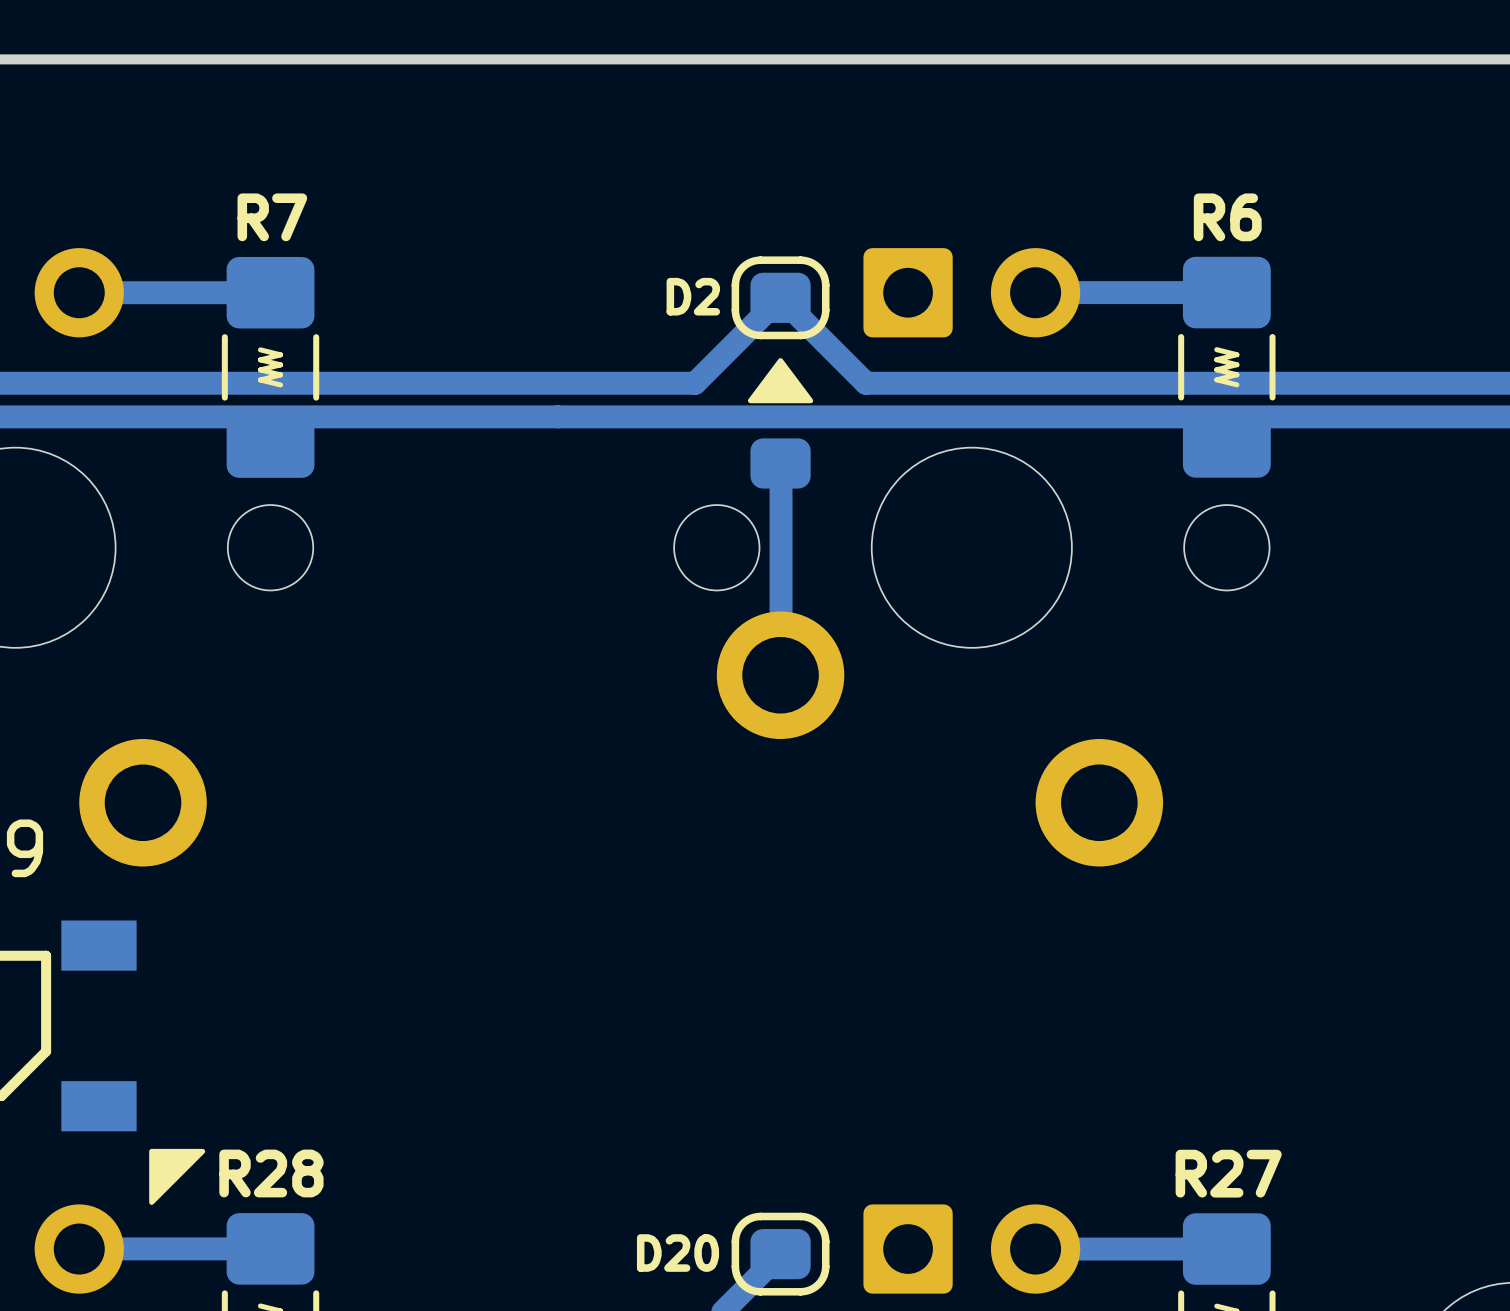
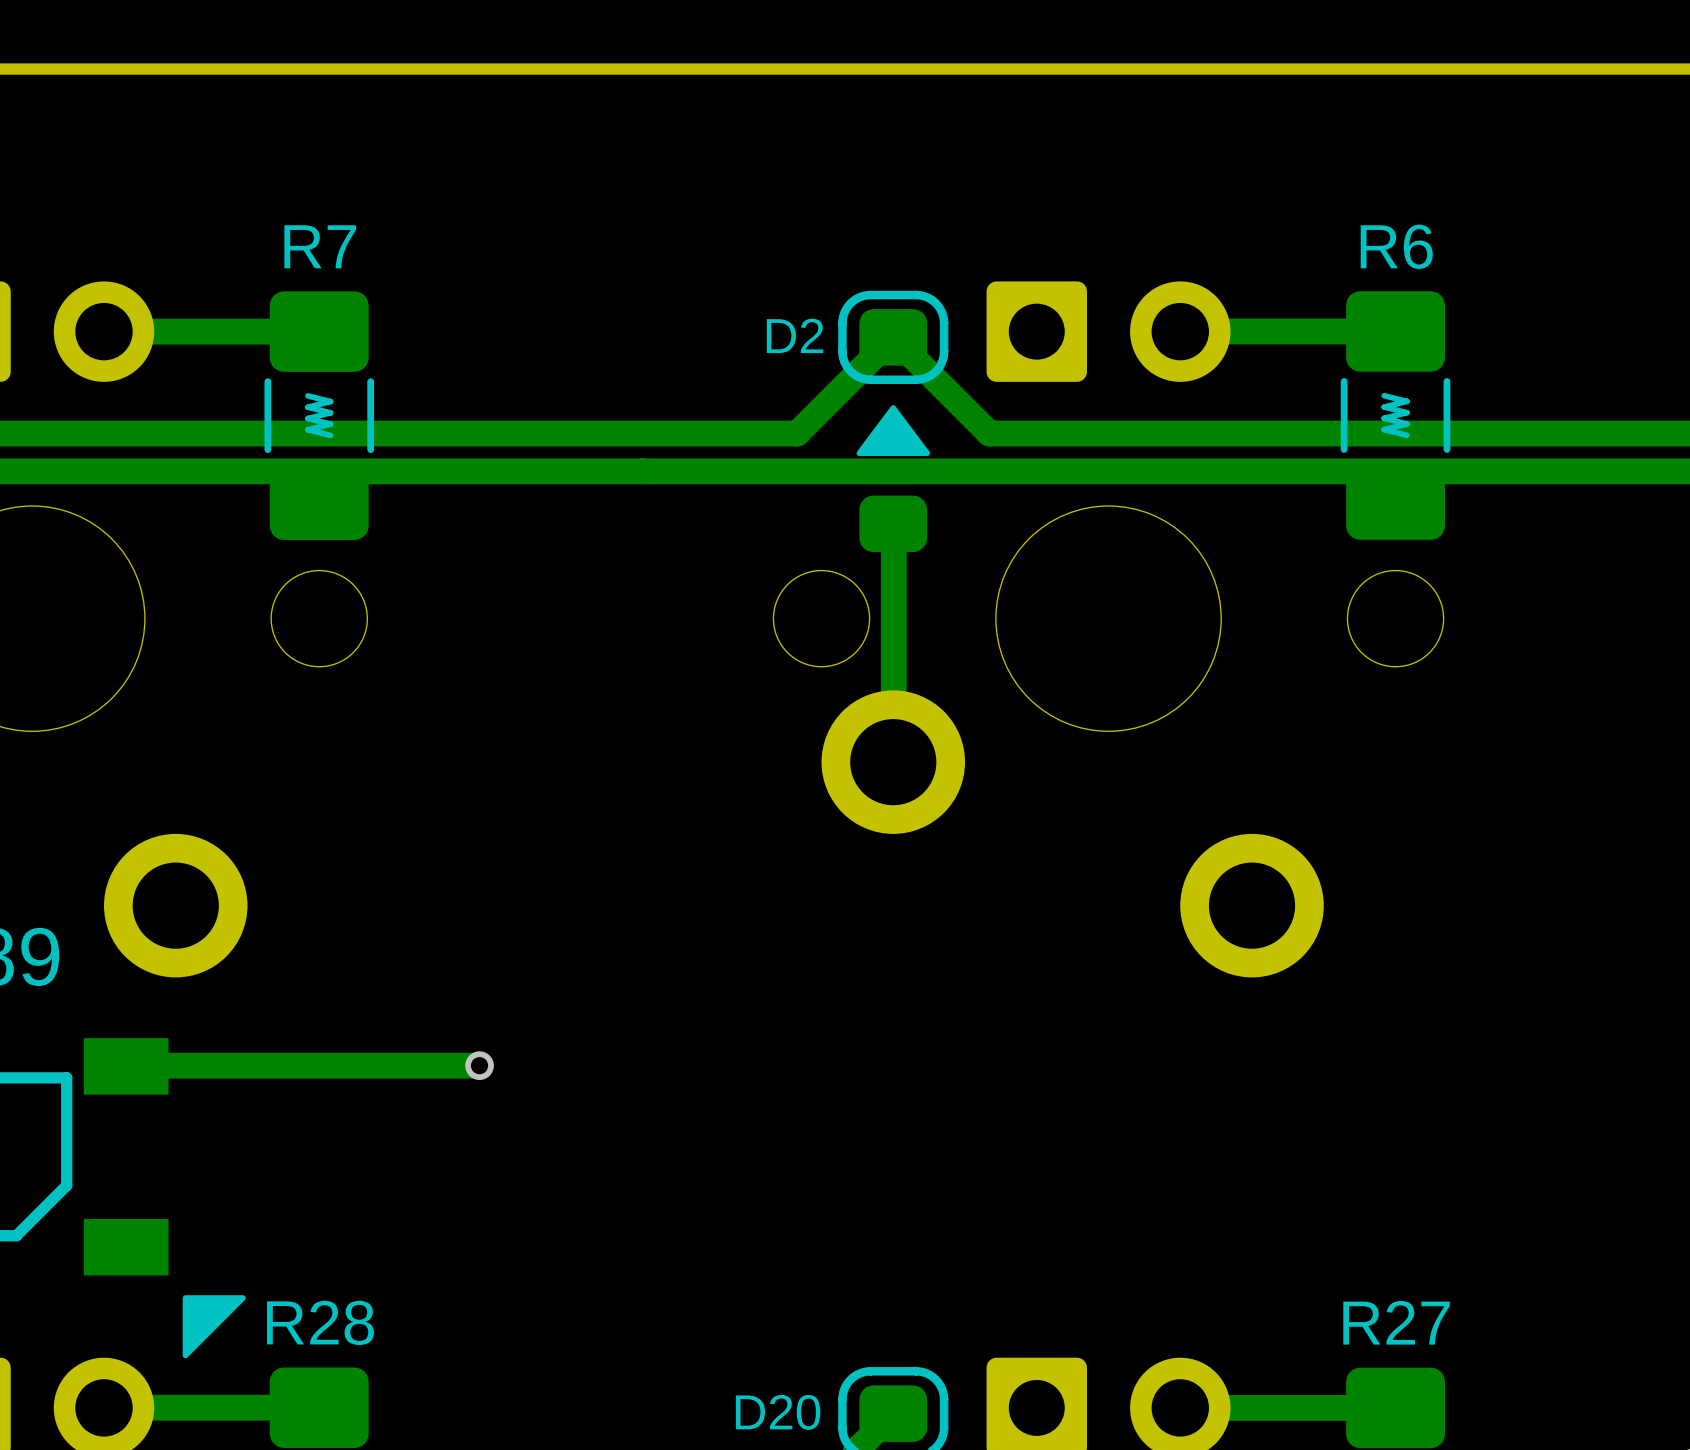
track: none -> (479, 1065) (126, 1065)
via: none -> (479, 1065)

